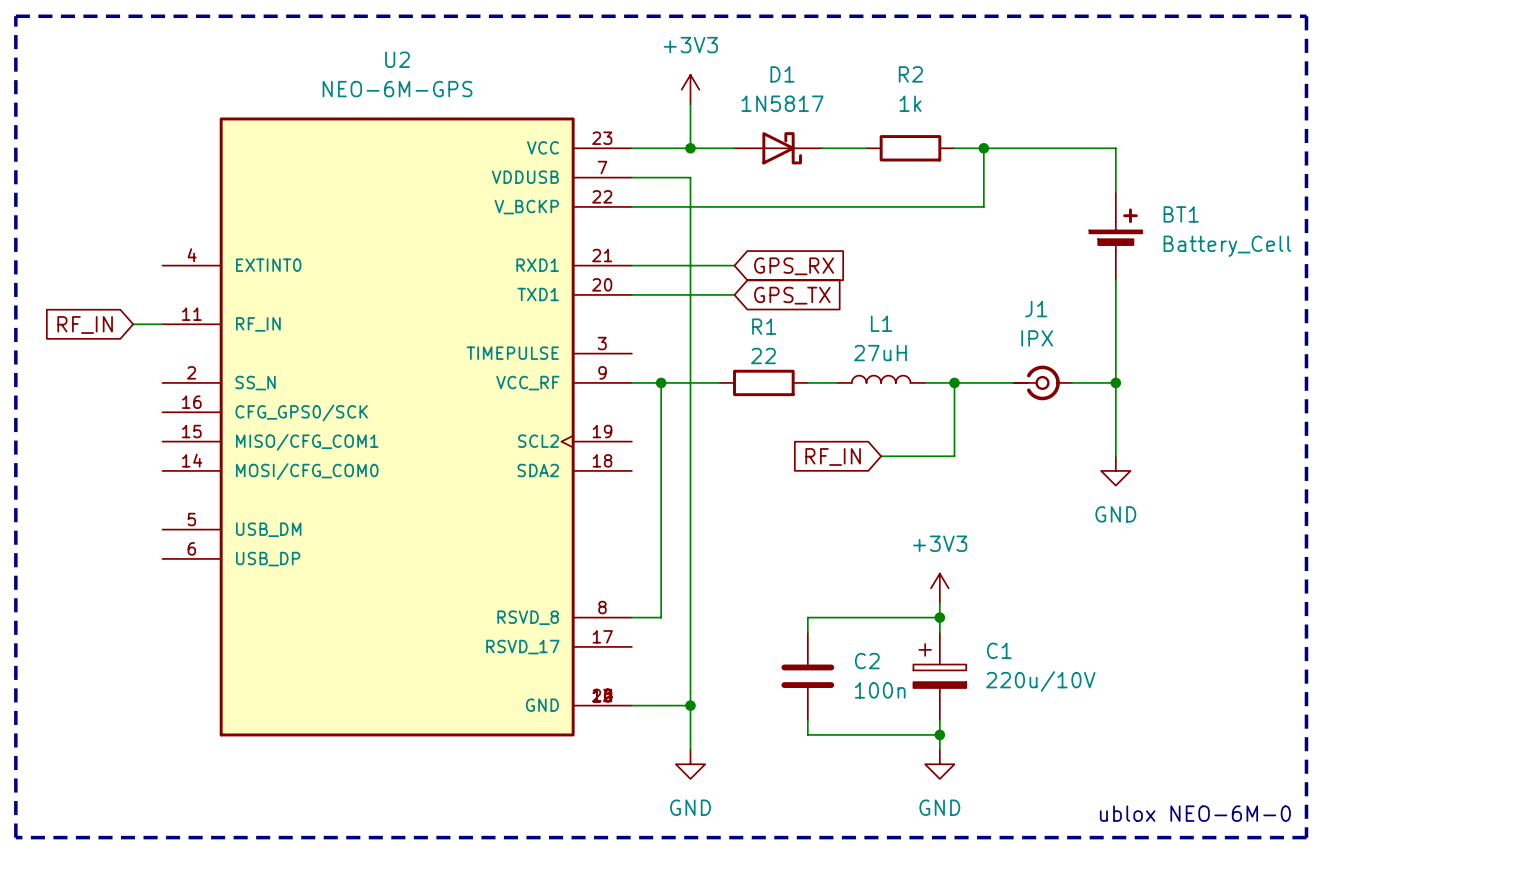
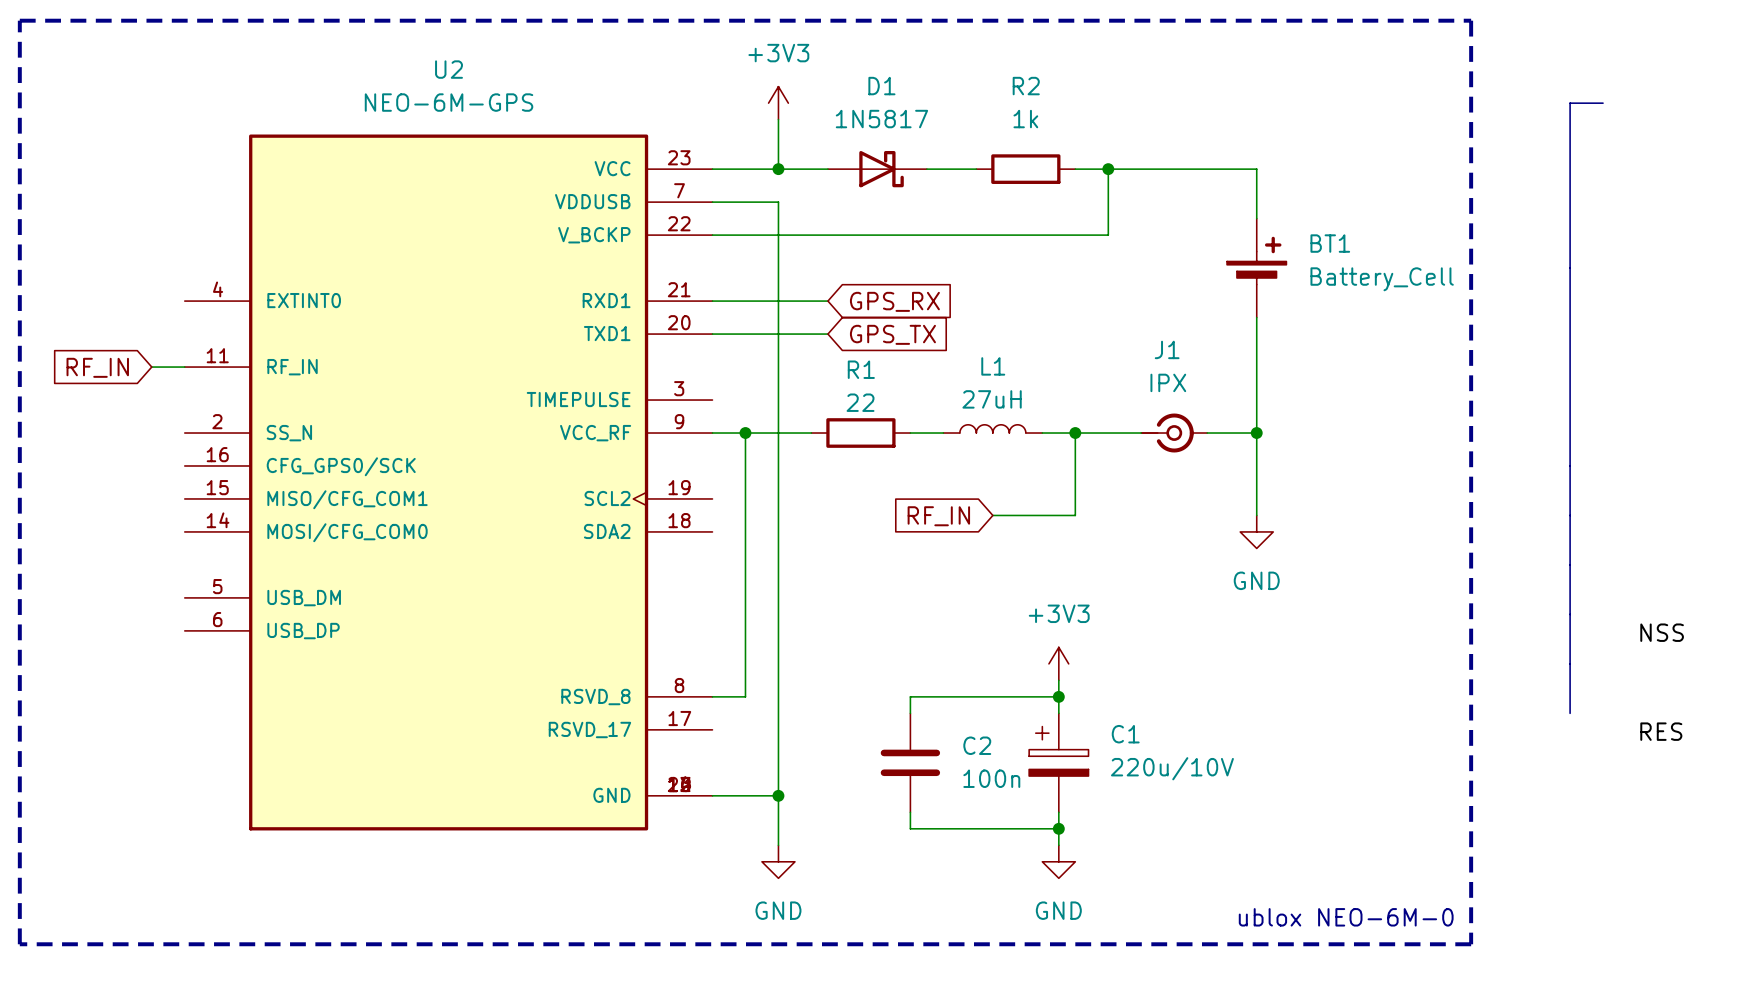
bus: none -> (1603, 103) (1570, 103) (1570, 713)
label: none -> NSS (1662, 632)
label: none -> RES (1661, 731)

